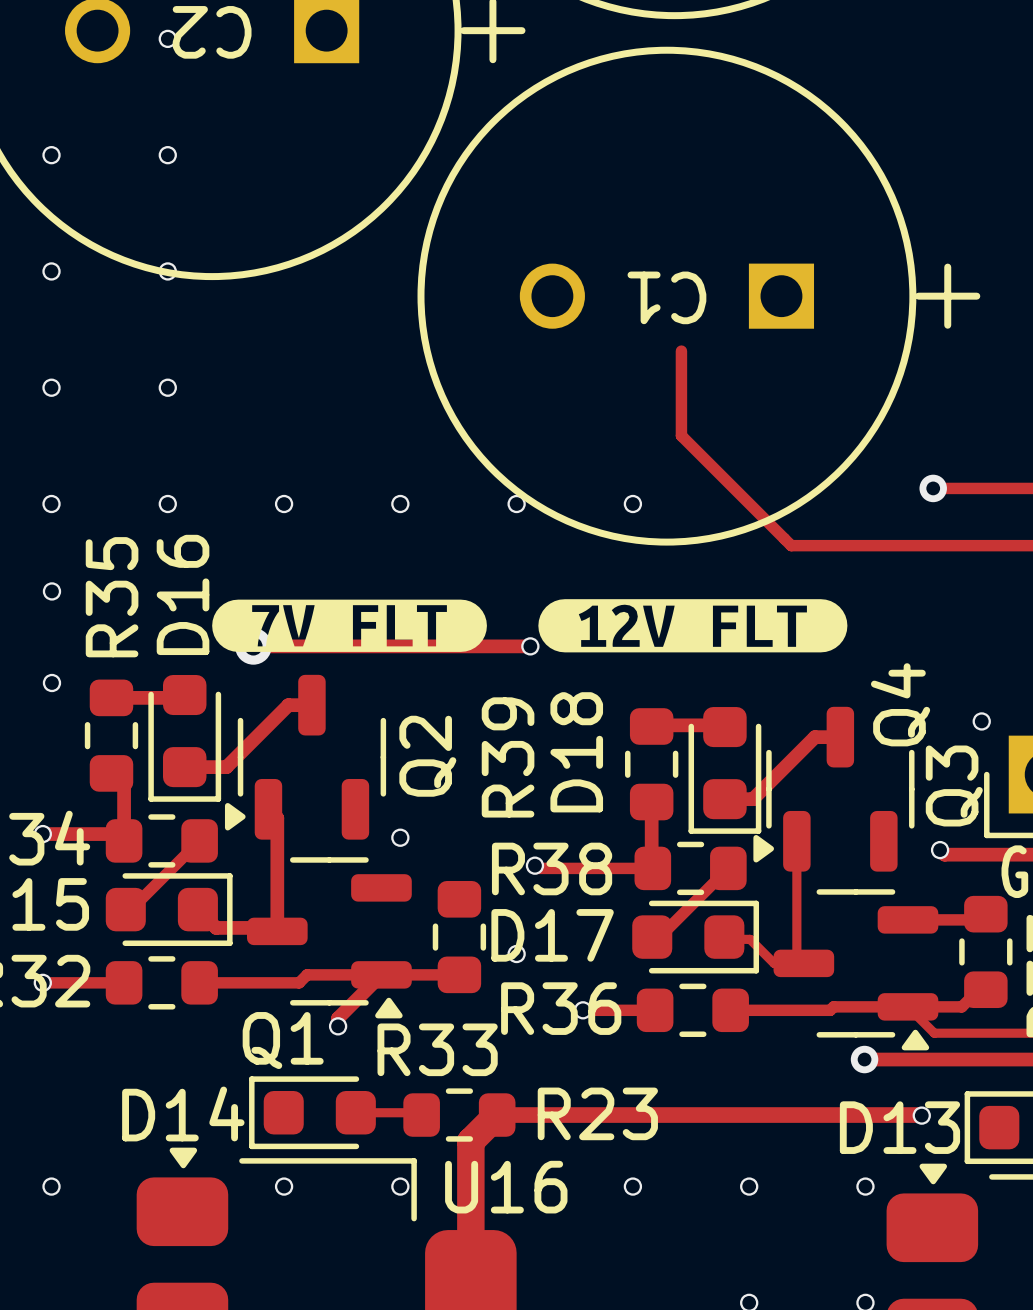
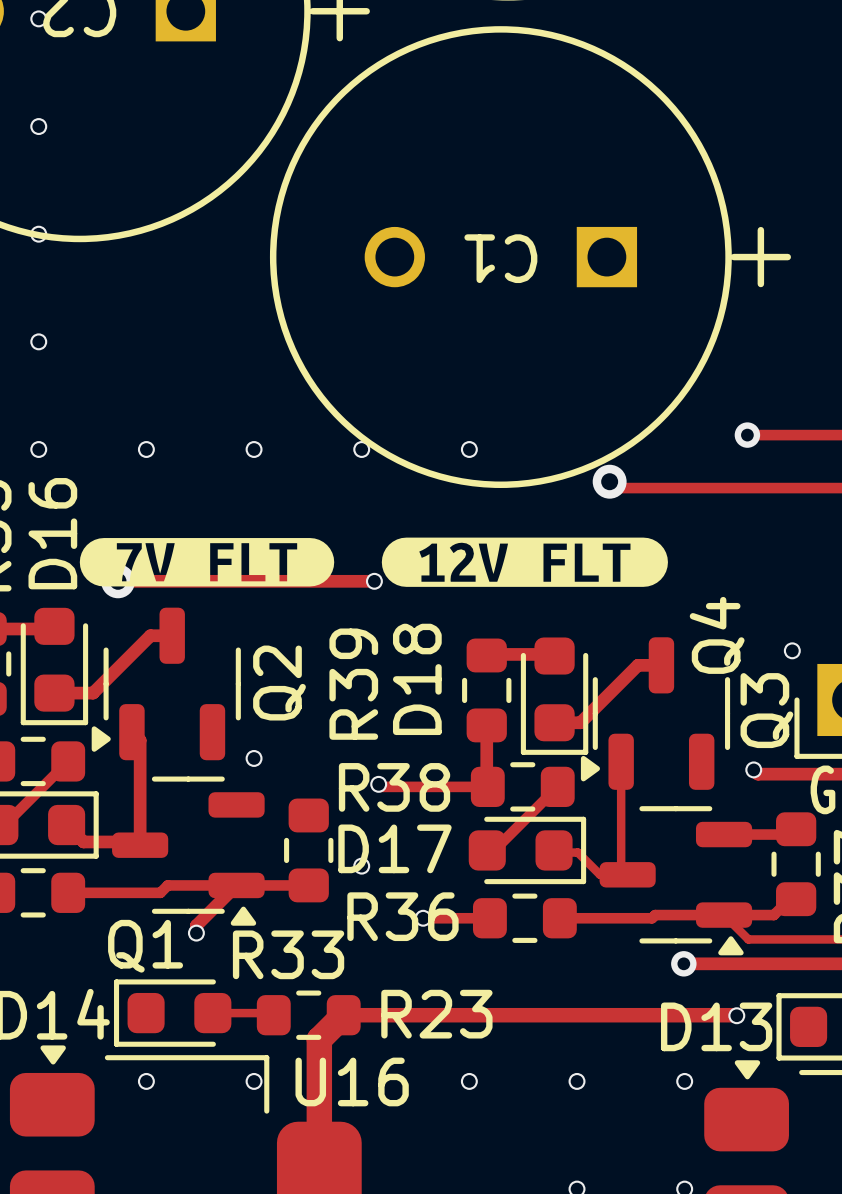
track: (681, 351) (681, 435) (784, 538) -> none
via: none -> (609, 481)

